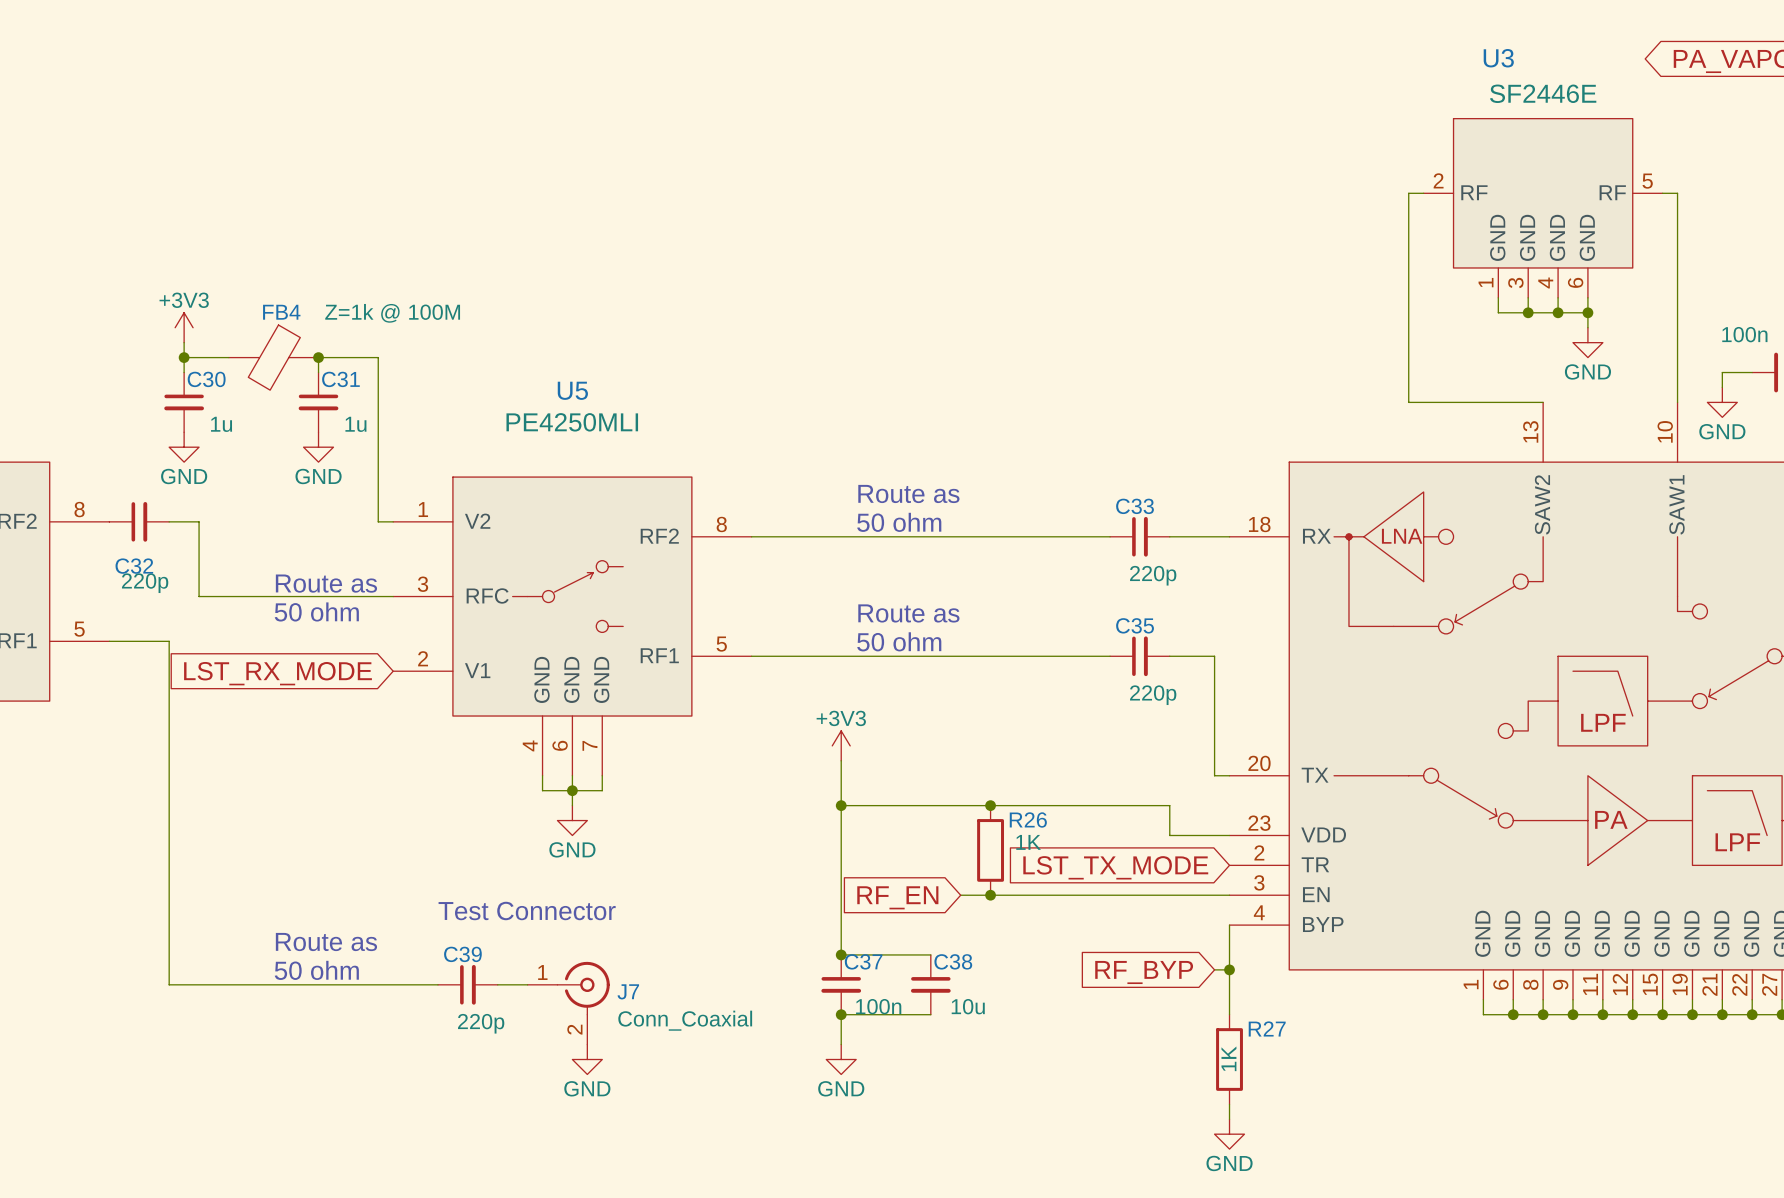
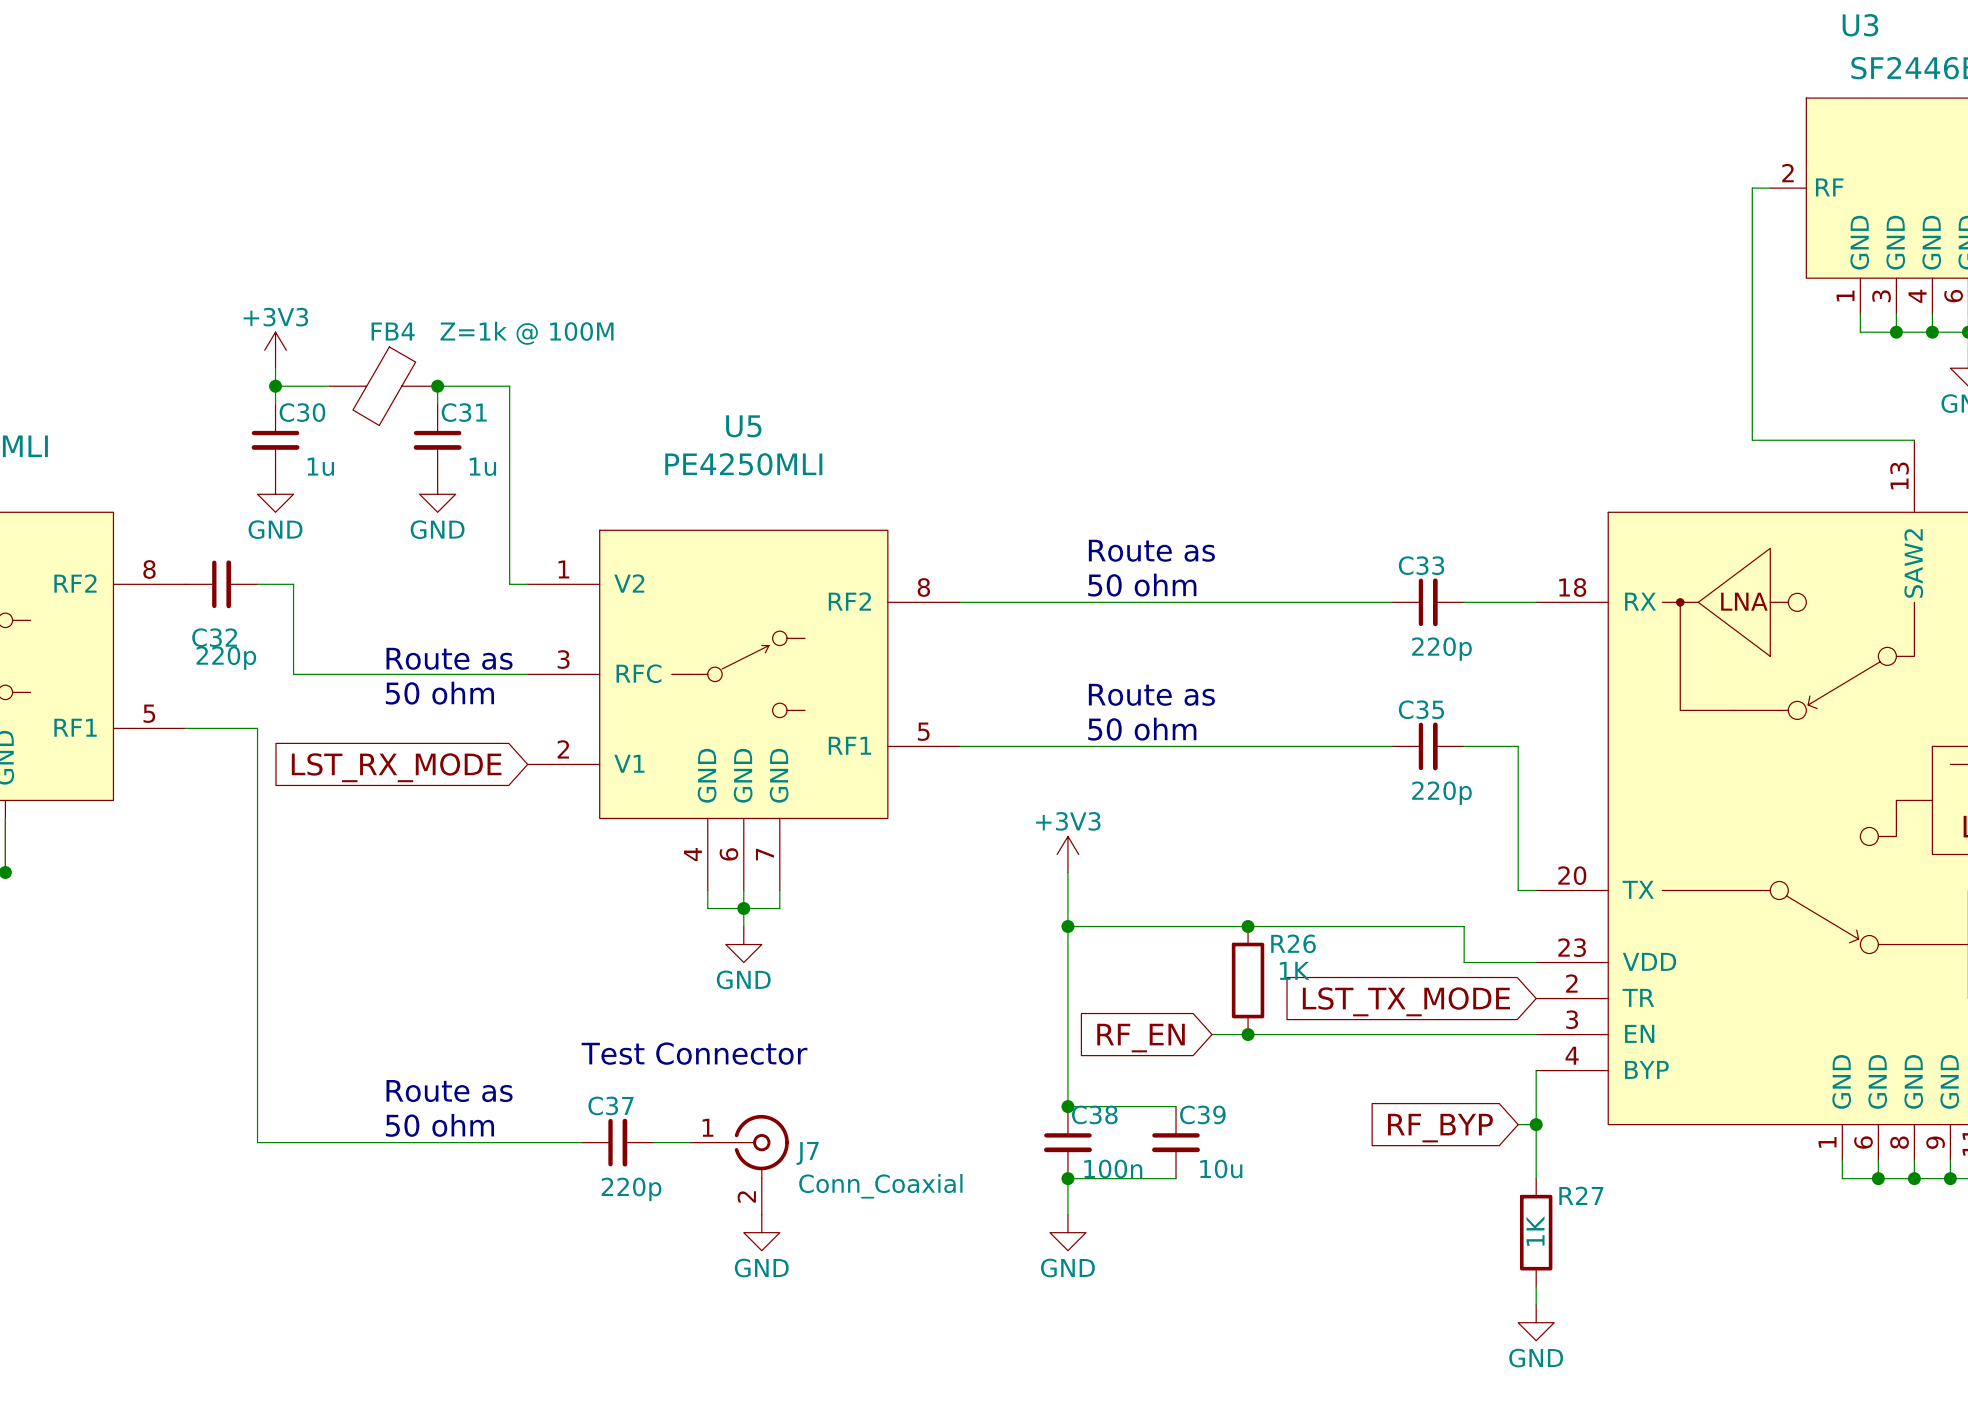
C39 name: C39 (462, 954) -> C37 (611, 1105)
C37 name: C37 (863, 961) -> C38 (1094, 1114)
C38 name: C38 (953, 961) -> C39 (1202, 1114)

